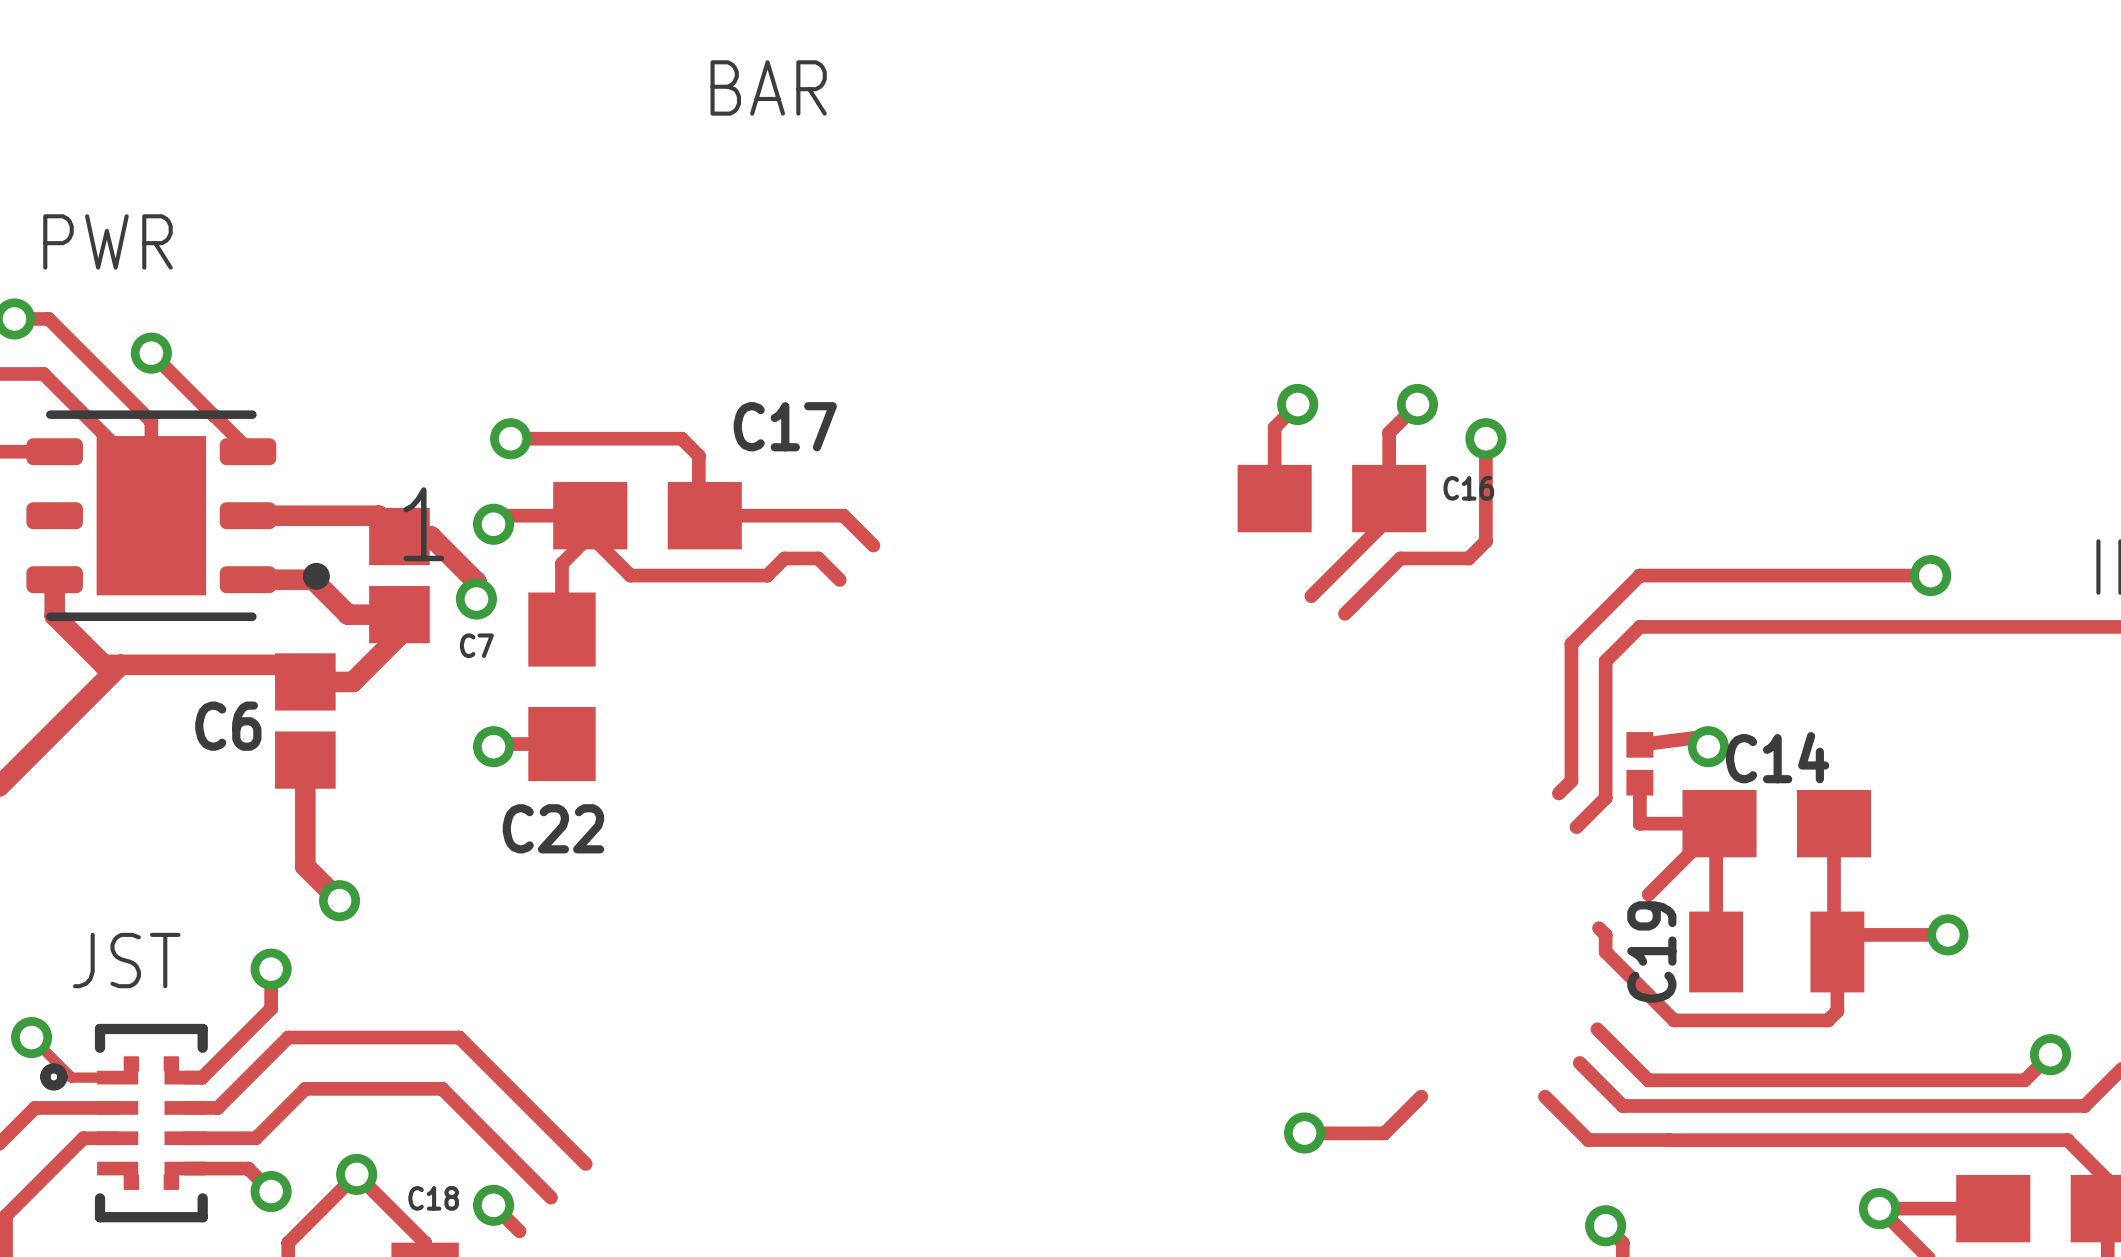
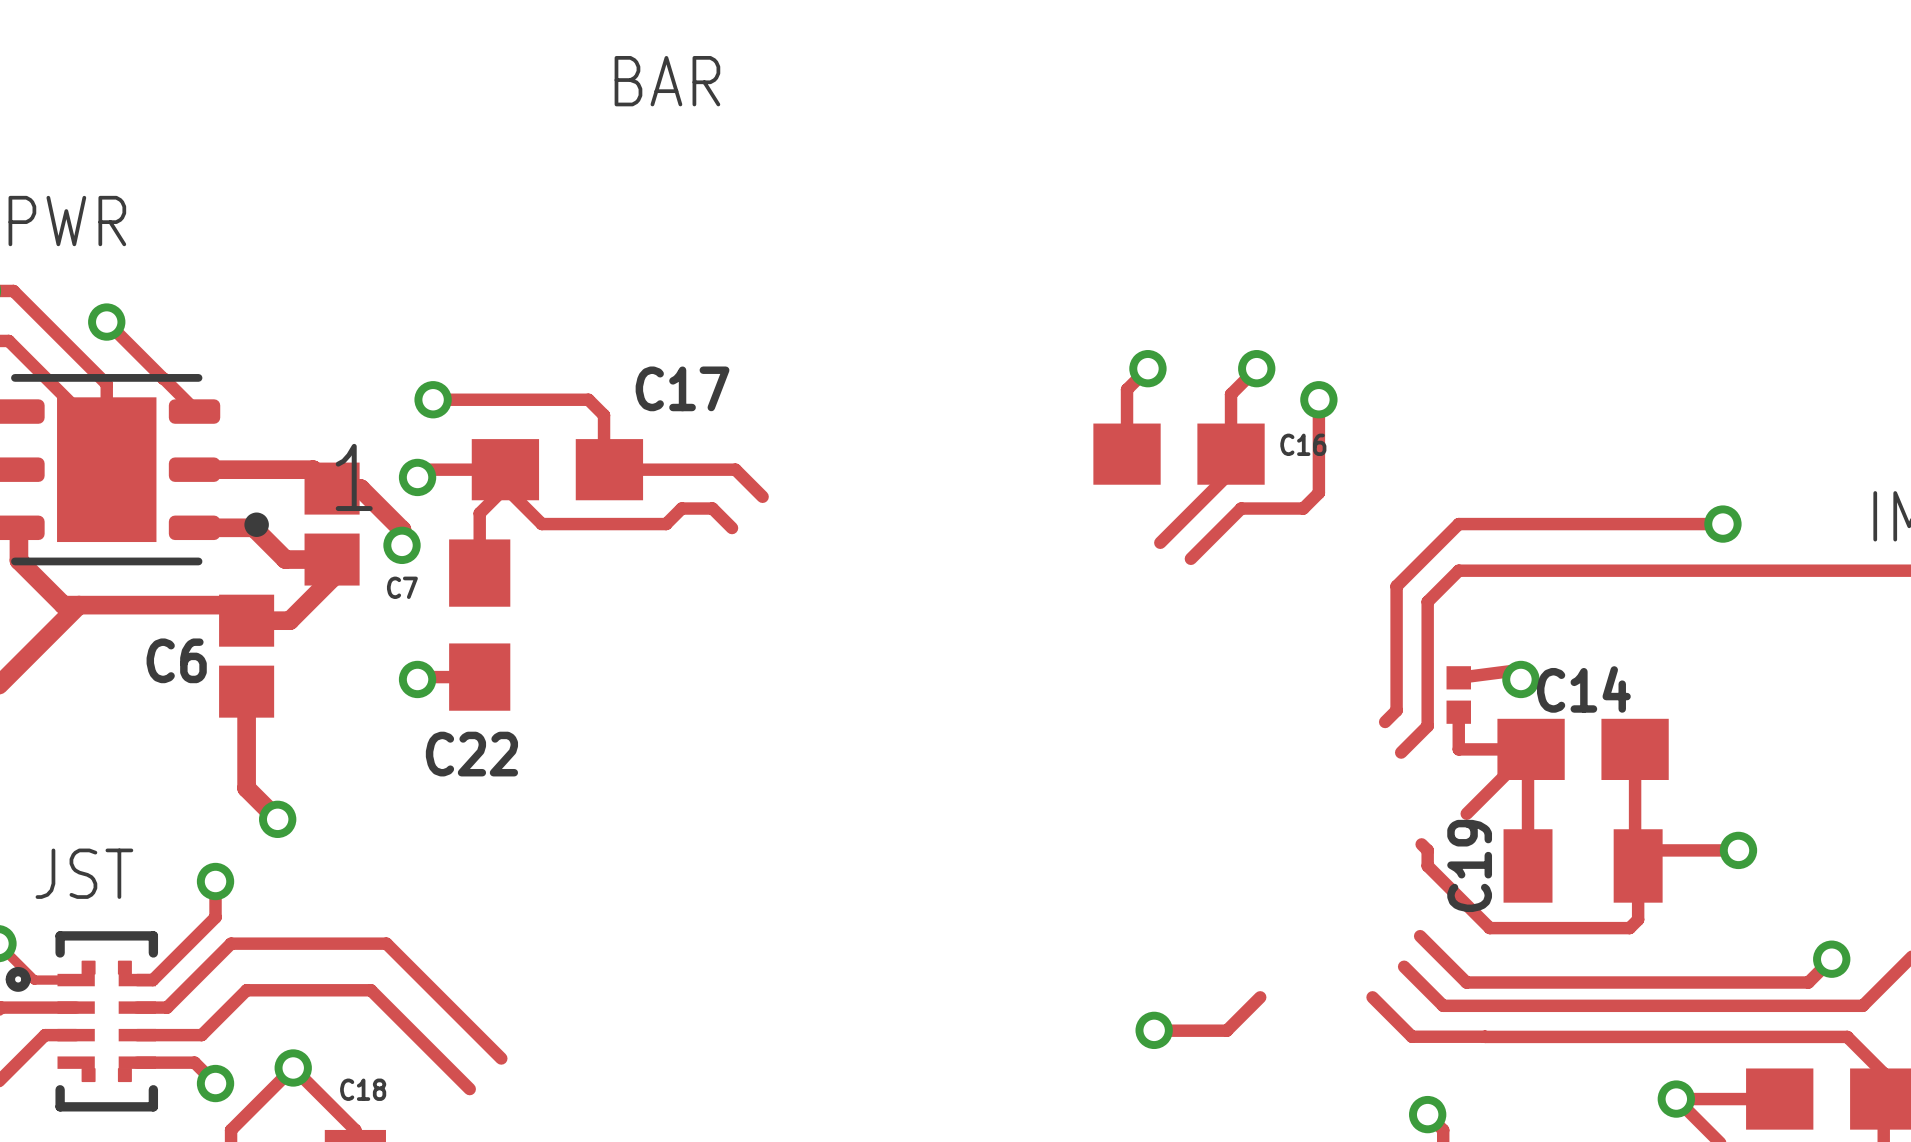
track: (493, 1205) (519, 1231) -> none
via: (493, 1205) -> none

